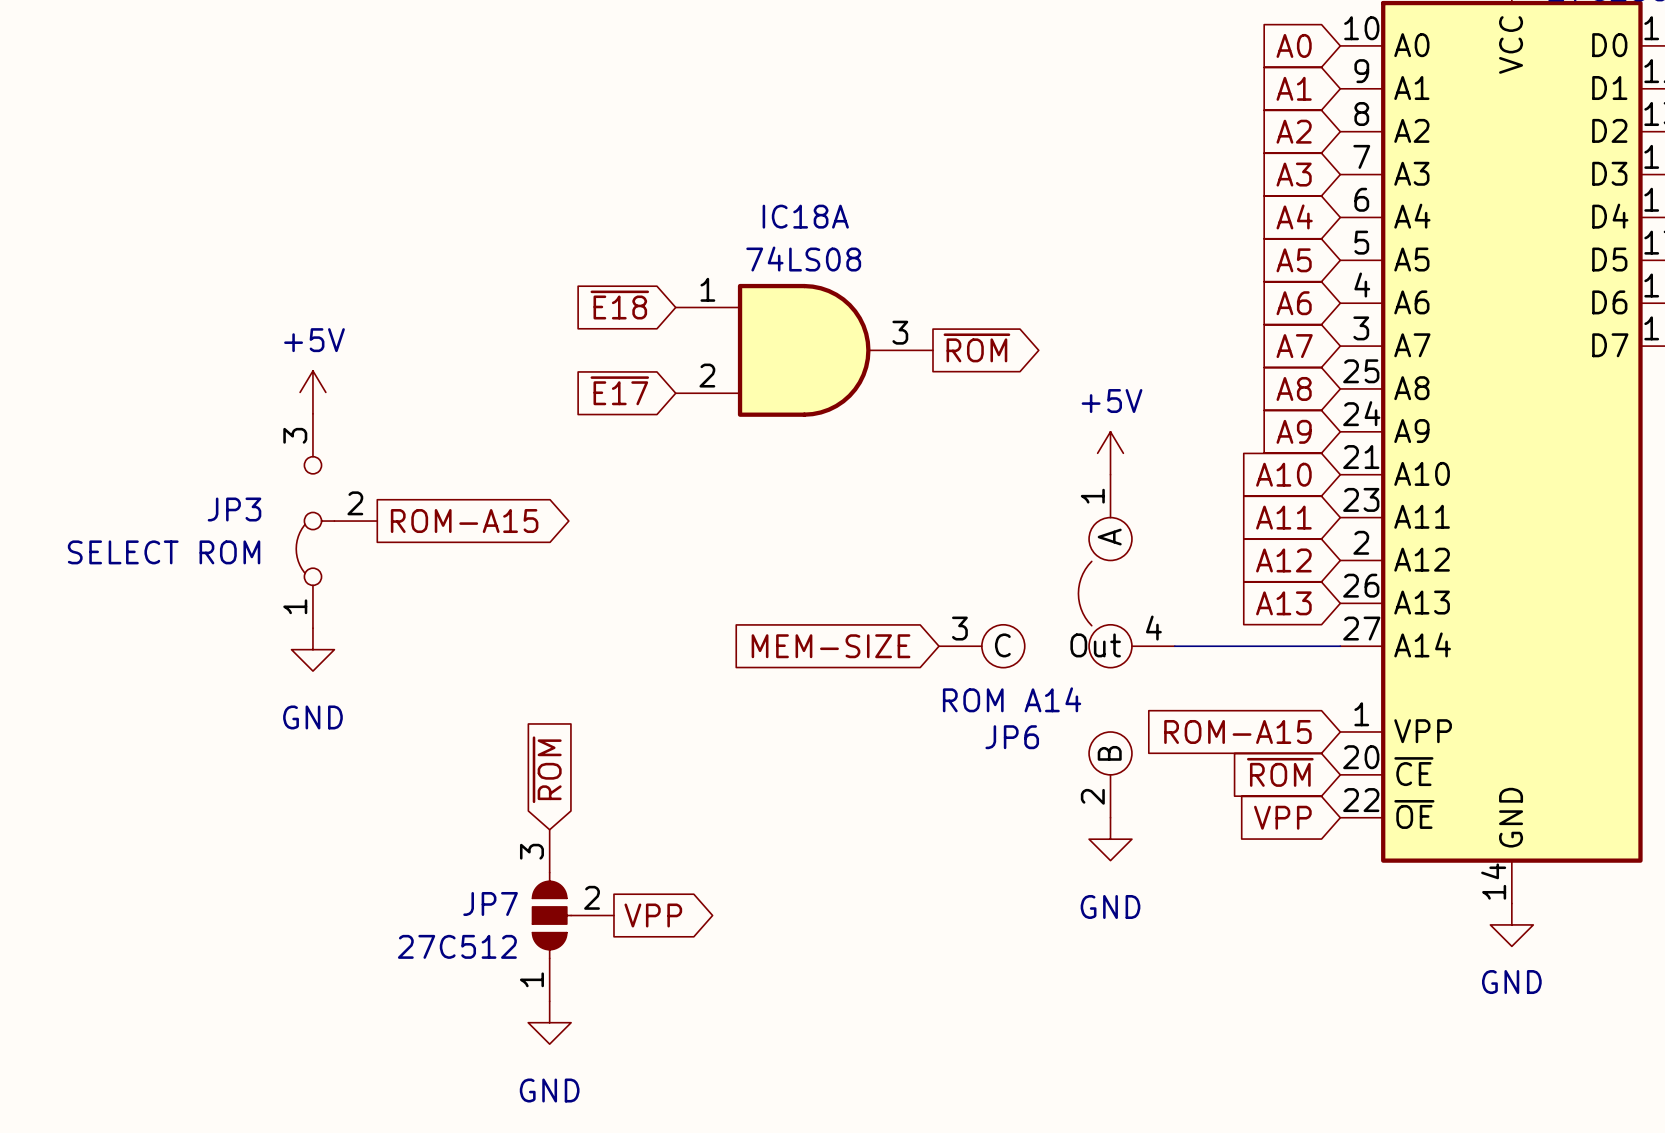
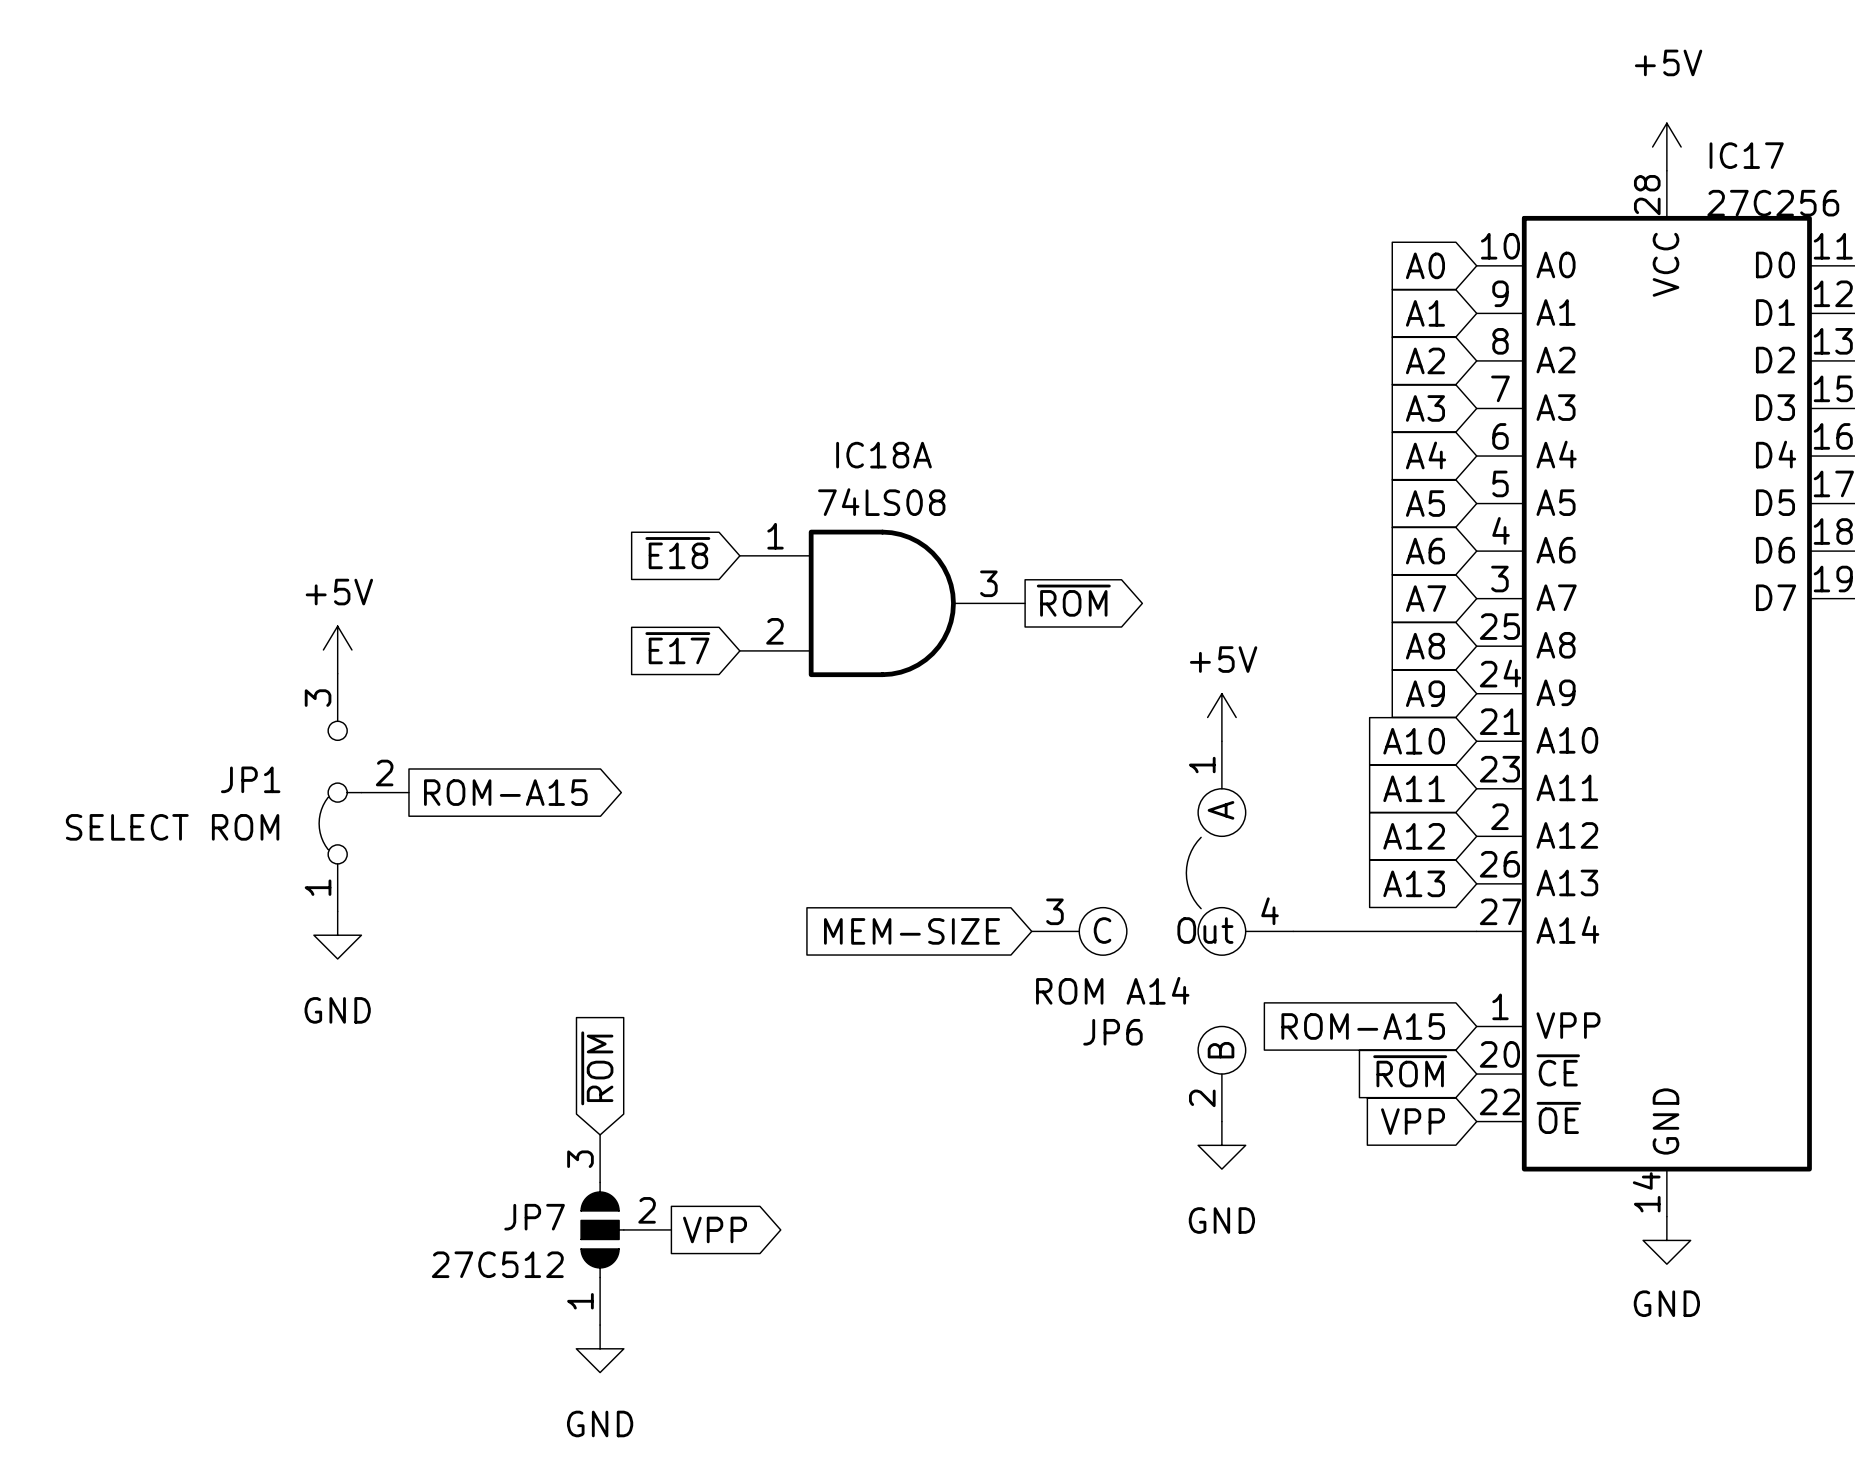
JP3 name: JP3 (234, 509) -> JP1 (250, 779)

